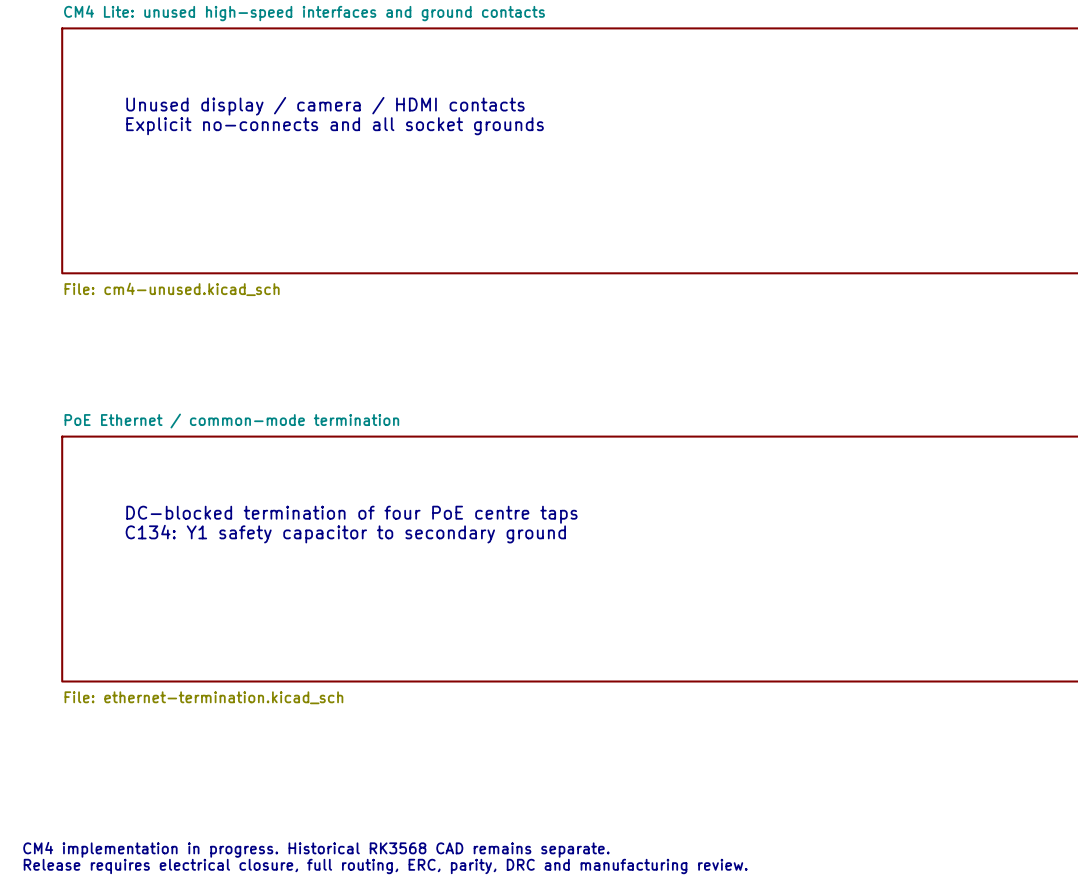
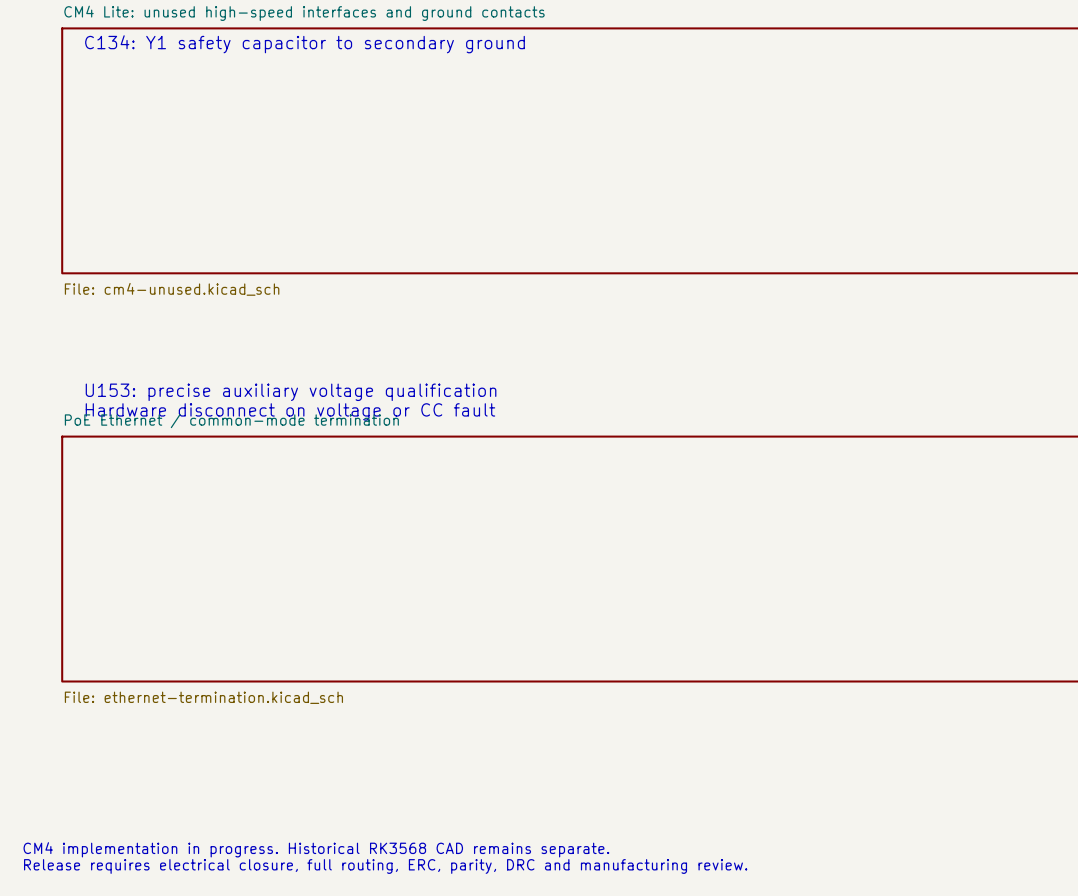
text: none -> C134: Y1 safety capacitor to secondary ground (304, 44)
text: Unused display / camera / HDMI contacts (325, 106) -> none
text: Explicit no-connects and all socket grounds (335, 126) -> none
text: none -> U153: precise auxiliary voltage qualification (291, 392)
text: none -> Hardware disconnect on voltage or CC fault (290, 411)
text: DC-blocked termination of four PoE centre taps (351, 514) -> none
text: C134: Y1 safety capacitor to secondary ground (345, 534) -> none

